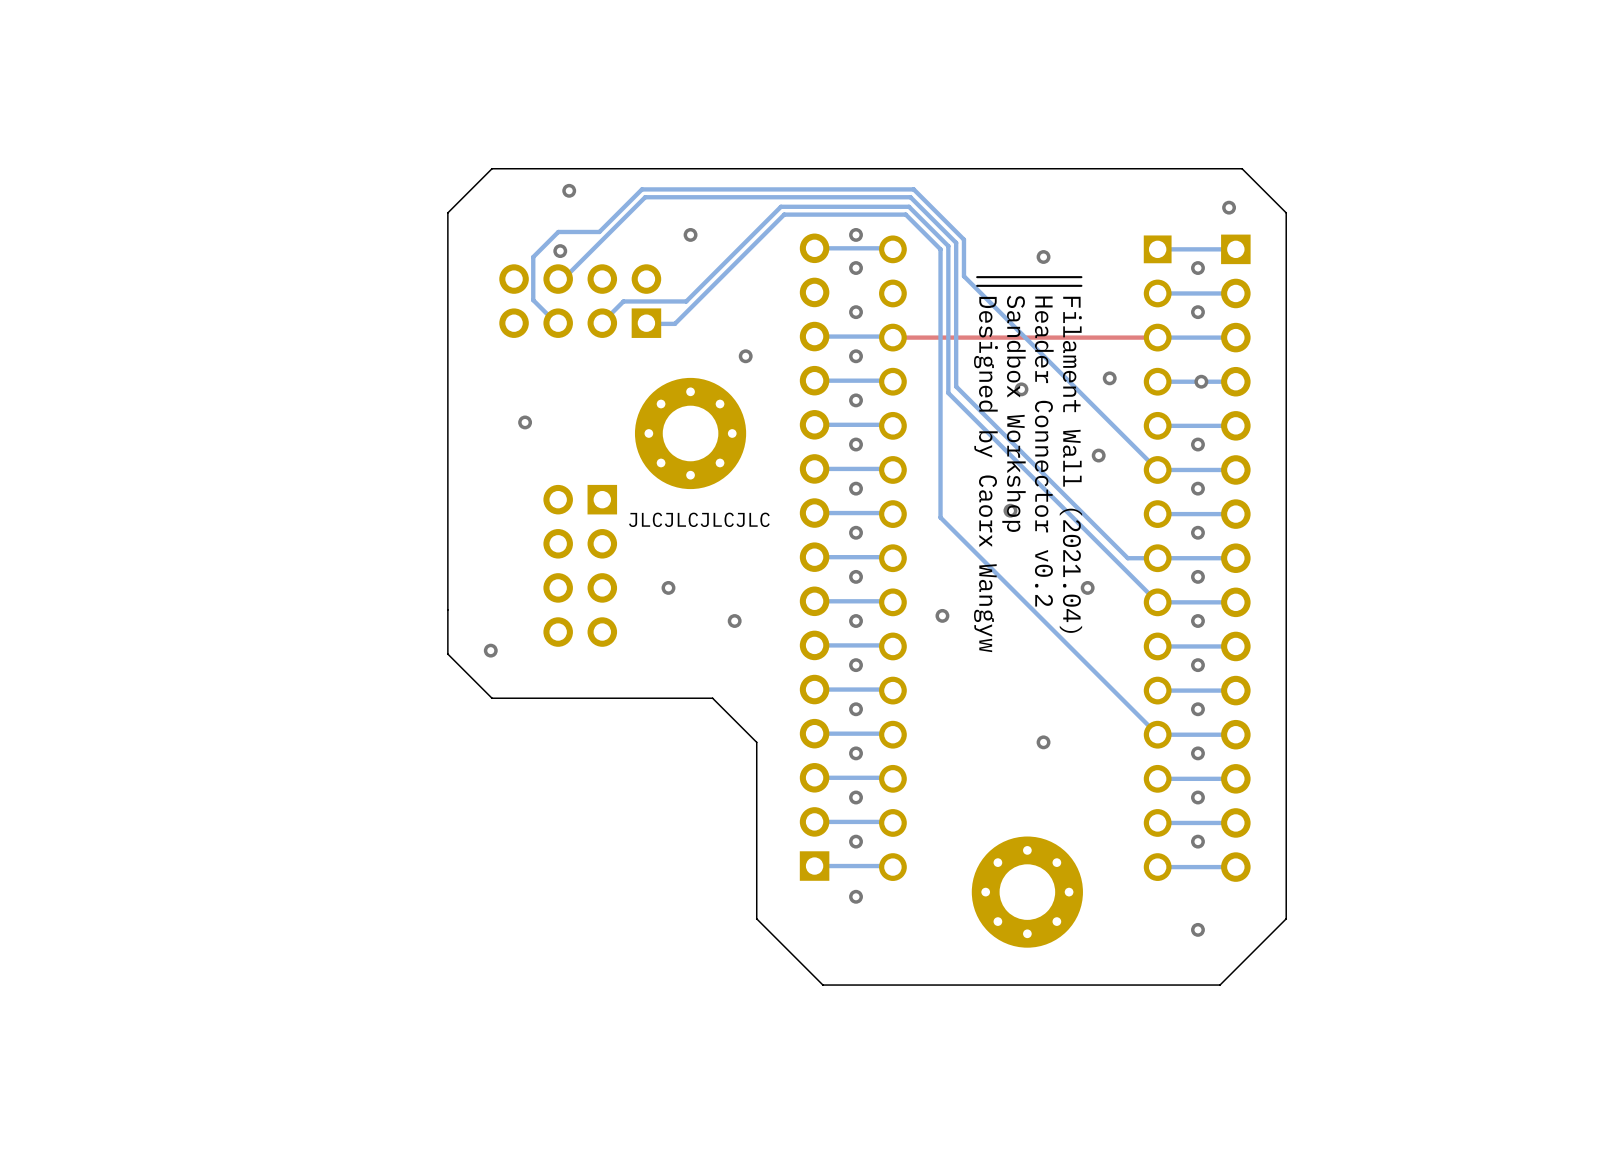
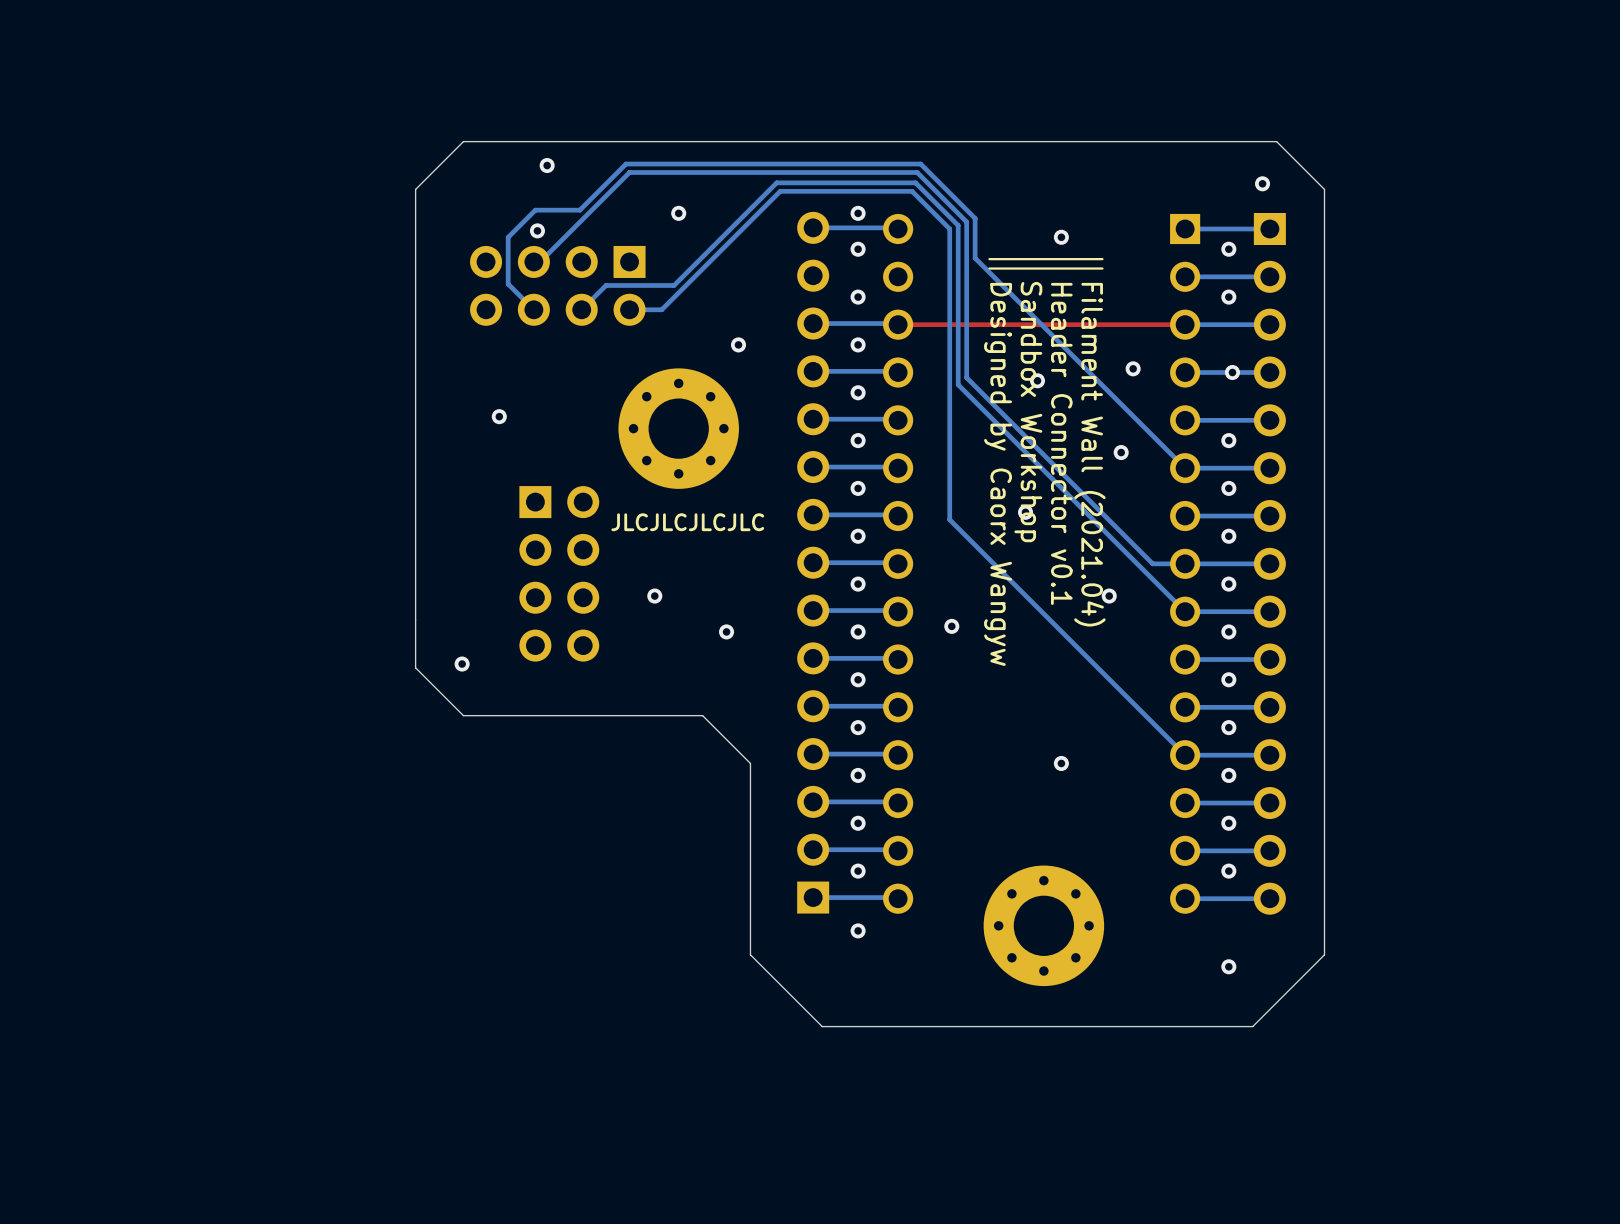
part footprint: [499, 264, 662, 338] -> [470, 245, 646, 326]
text: Header Connector v0.2 (1044, 451) -> Header Connector v0.1 (1061, 443)
part footprint: [543, 484, 618, 647] -> [519, 486, 600, 662]

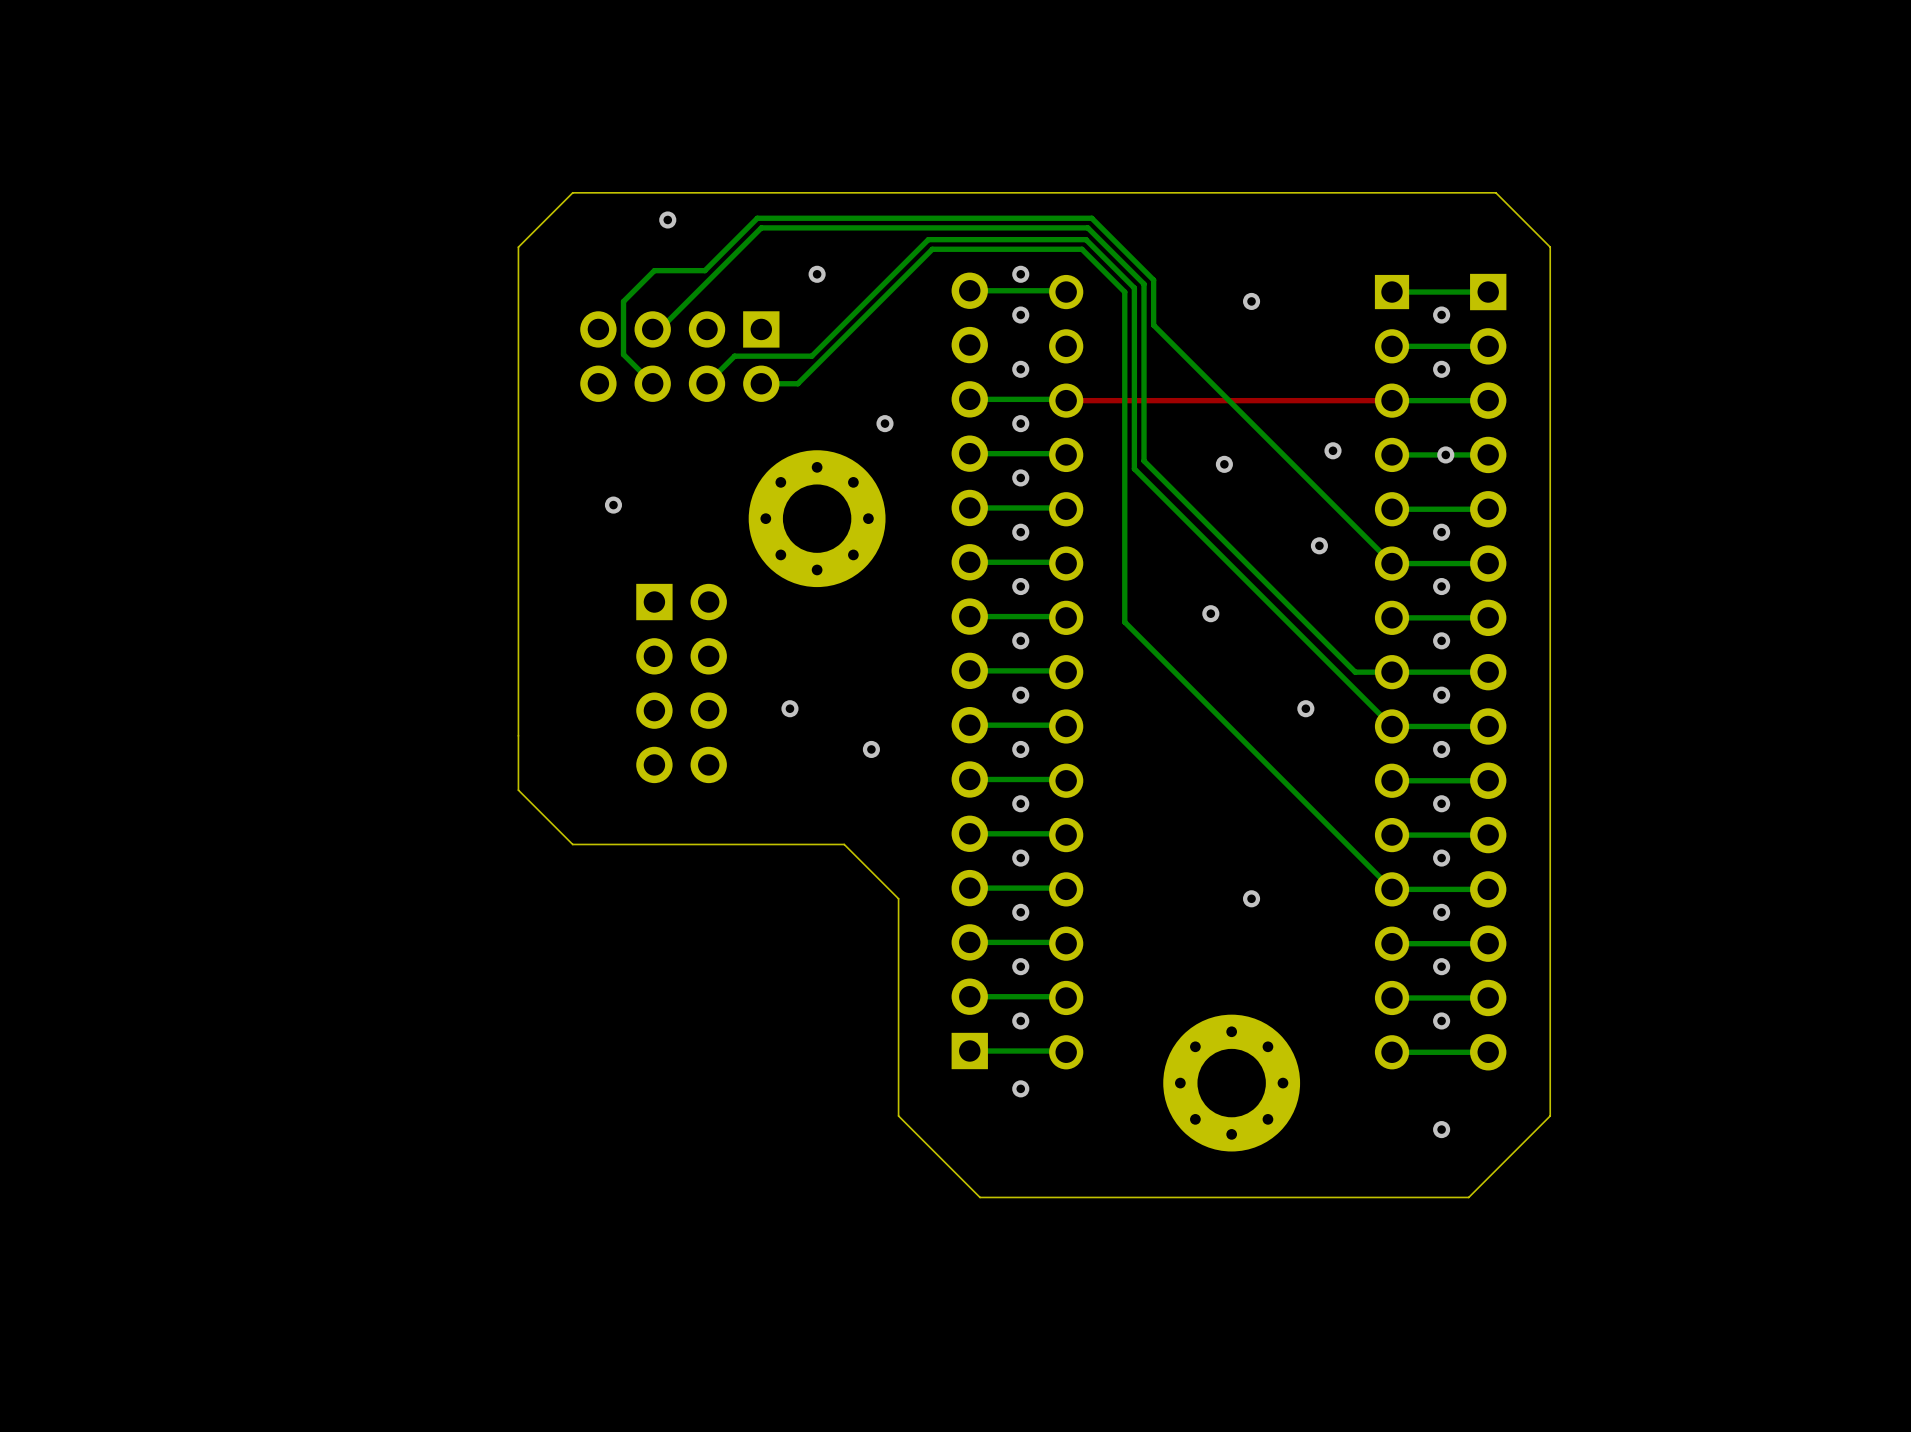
via: (1262, 183) -> none
via: (537, 230) -> none
line: (1102, 259) (989, 259) -> none
line: (1102, 268) (989, 268) -> none
text: Sandbox Workshop (1028, 412) -> none
text: Header Connector v0.1 (1061, 443) -> none
text: Filament Wall (2021.04) (1089, 454) -> none
text: Designed by Caorx Wangyw (998, 474) -> none
text: JLCJLCJLCJLC (687, 522) -> none
via: (951, 626) -> none
via: (462, 664) -> none

